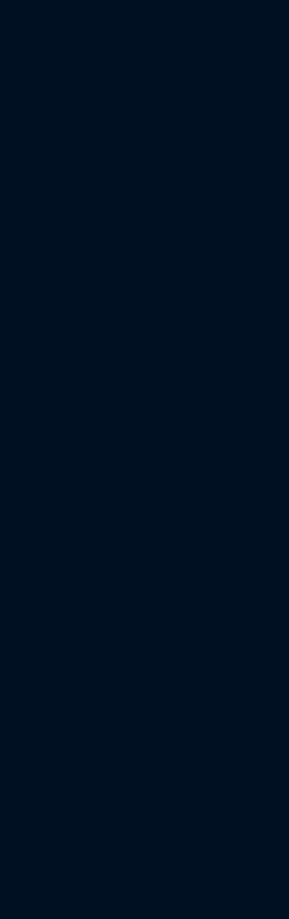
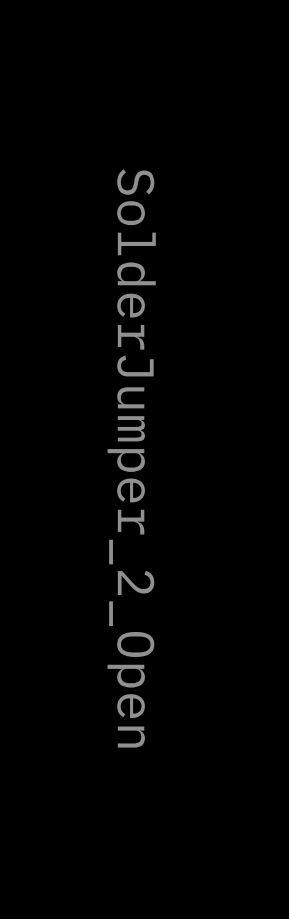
part: none -> SolderJumper_2_Open (131, 458)

